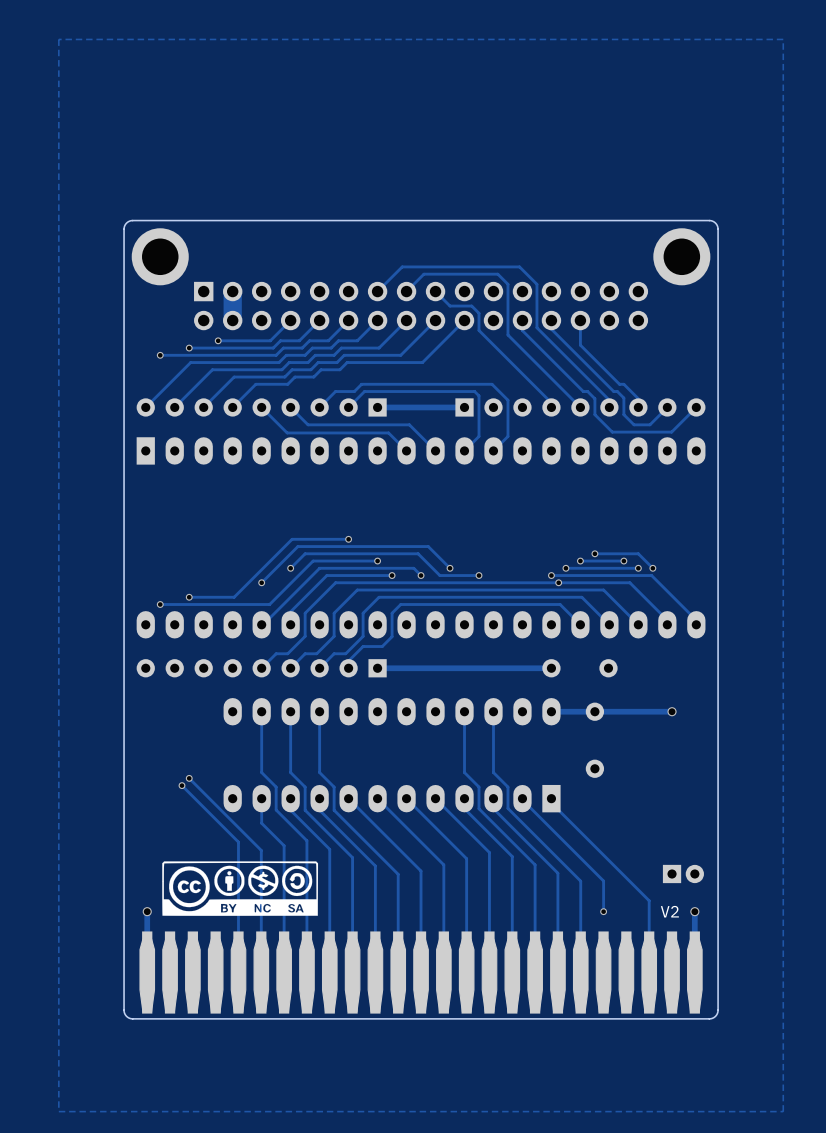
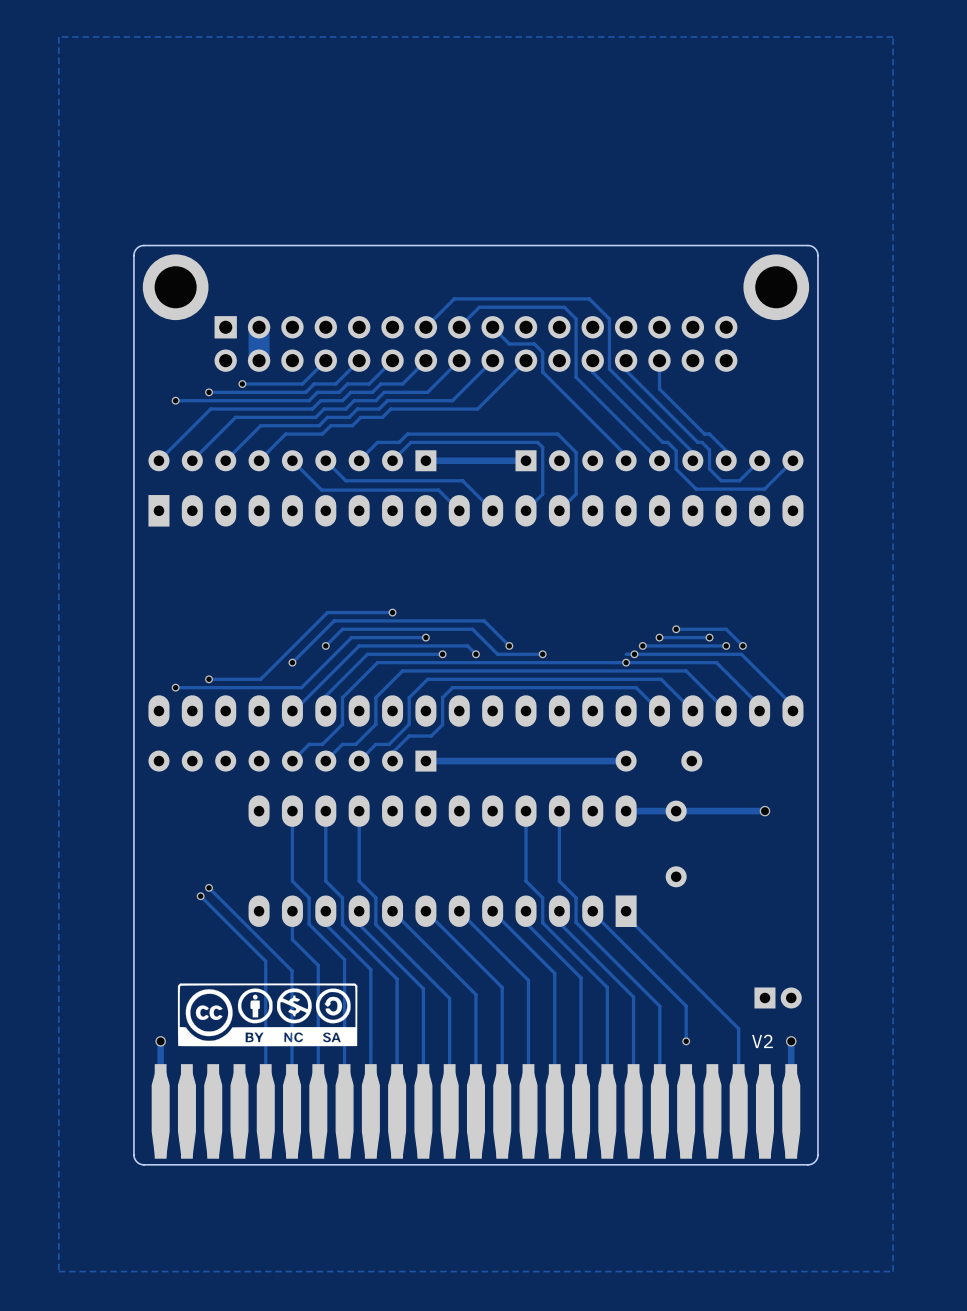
via: (551, 575) -> none
via: none -> (634, 654)
via: none -> (626, 662)
via: (558, 582) -> none

